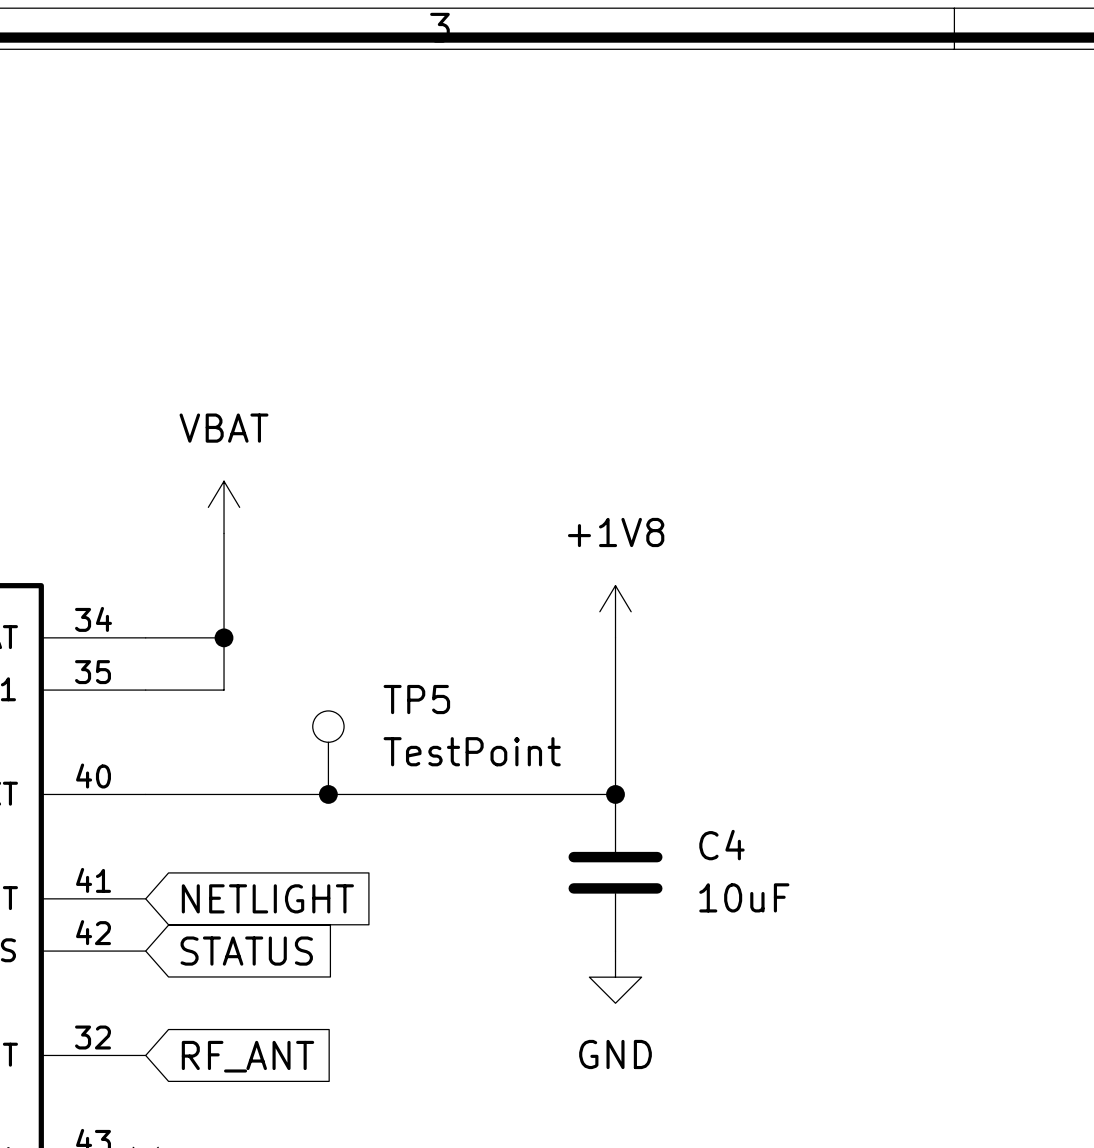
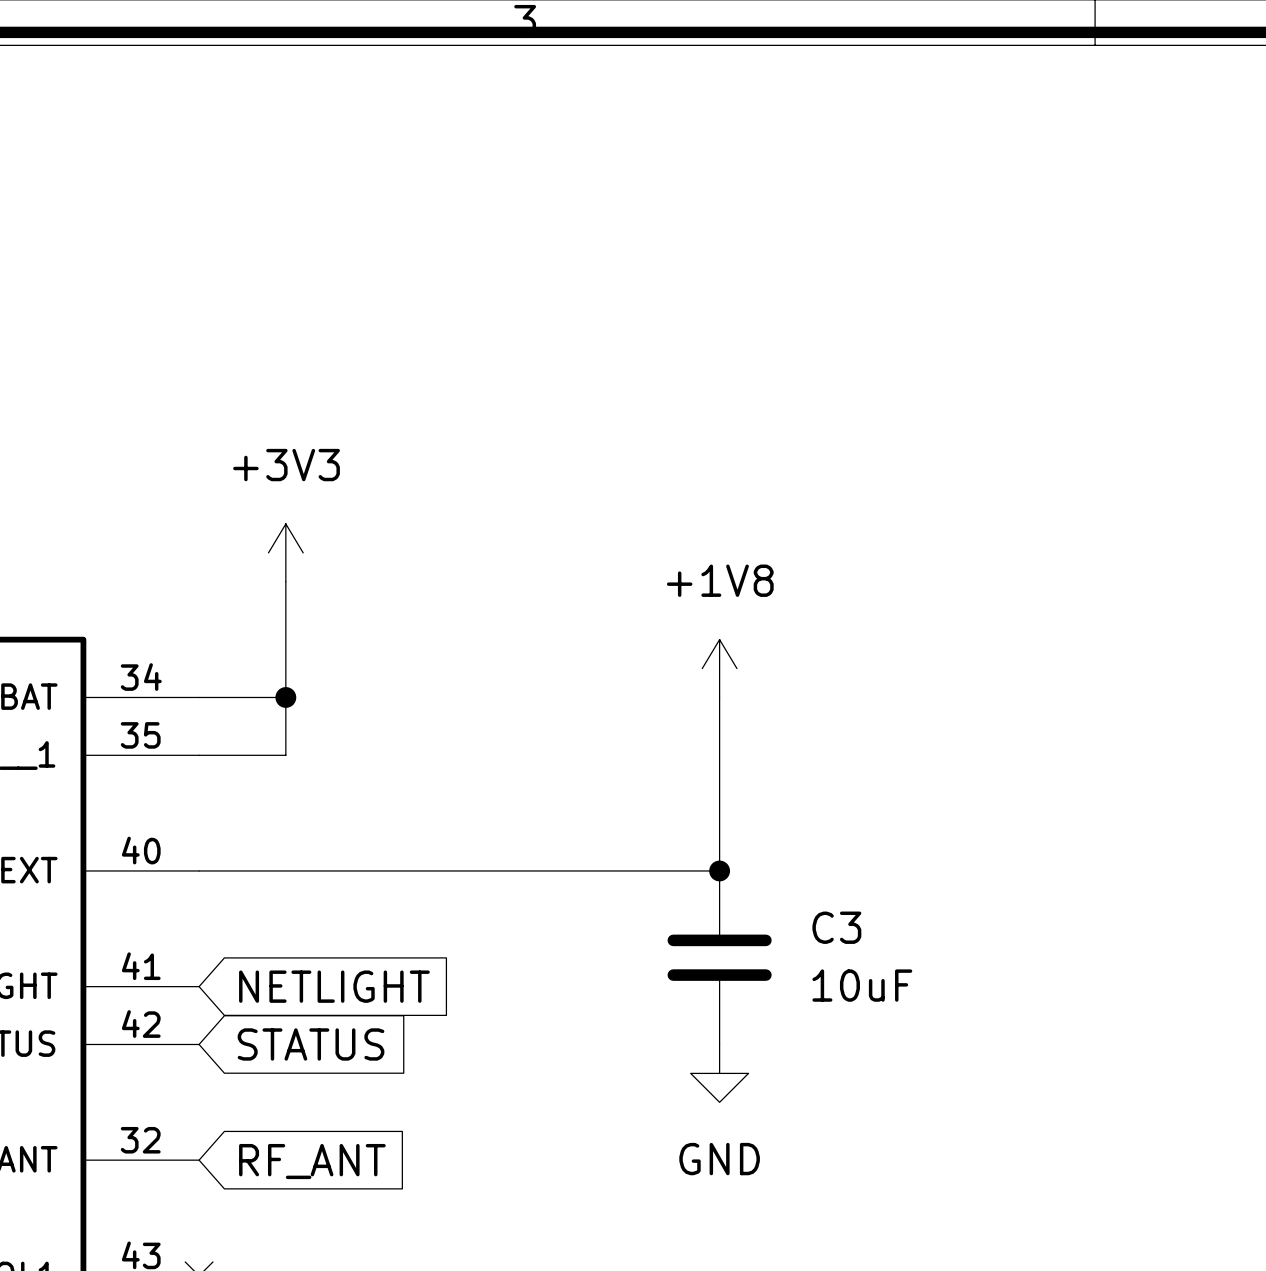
power symbol: VBAT (224, 507) -> +3V3 (285, 552)
TP5: TestPoint (328, 752) -> none
junction: (328, 794) -> none
C4 name: C4 (721, 845) -> C3 (836, 927)

